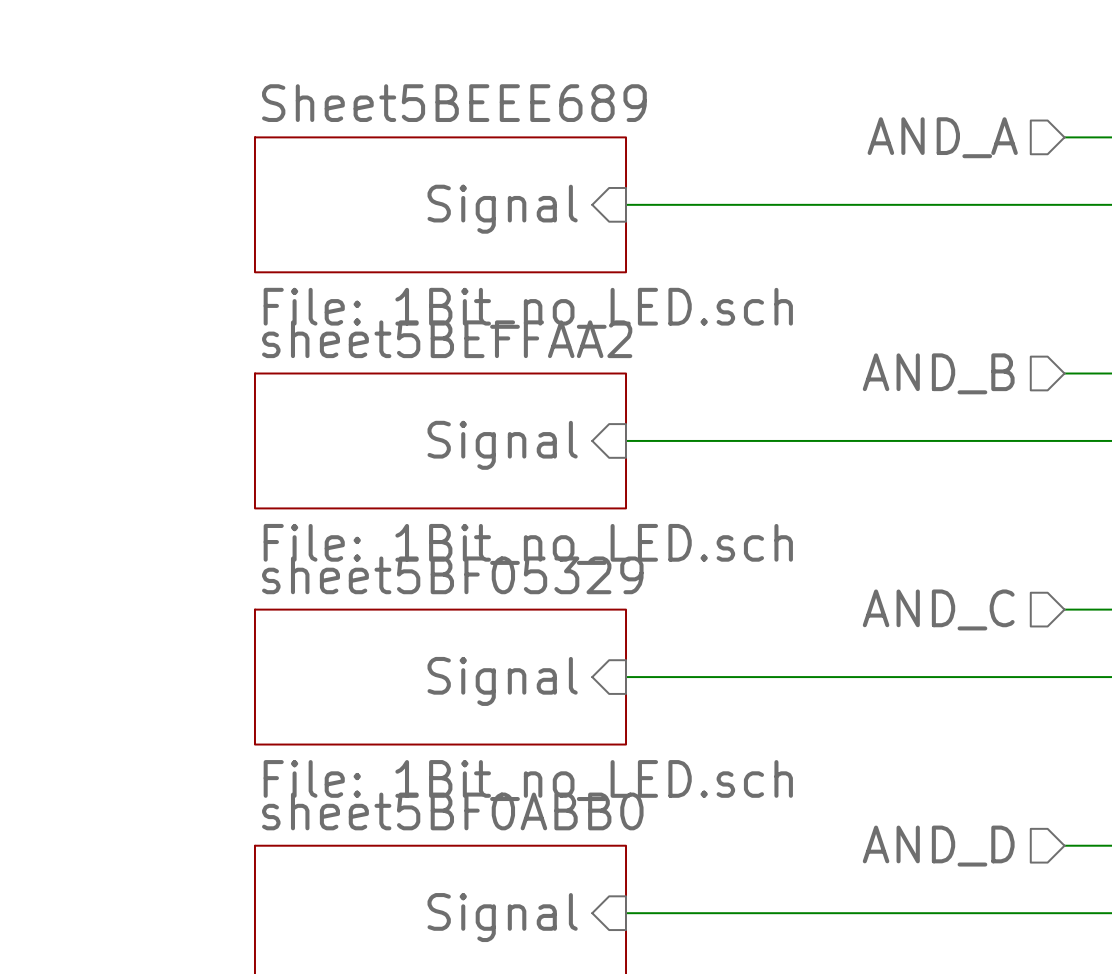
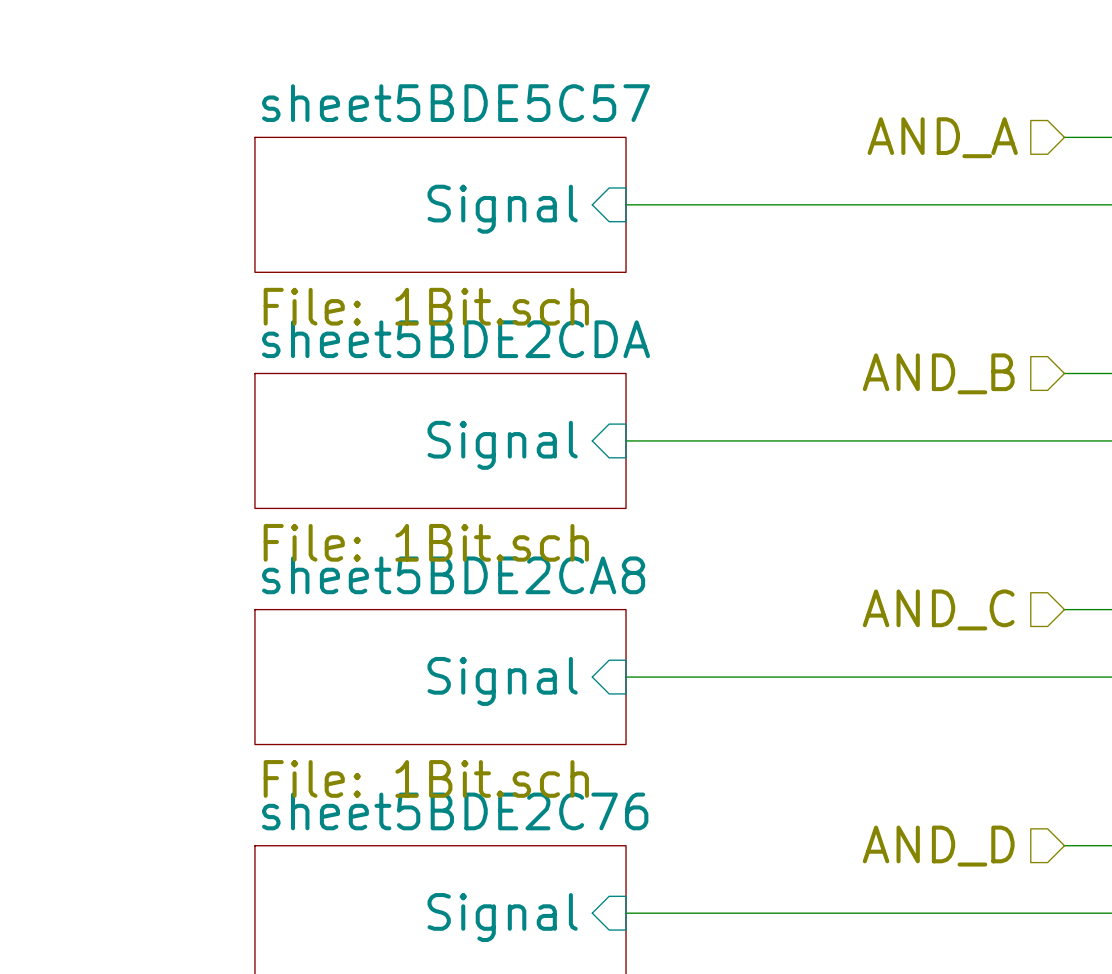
sheet Sheet5BEEE689 name: Sheet5BEEE689 (454, 103) -> sheet5BDE5C57 (456, 103)
sheet Sheet5BEEE689 value: File: 1Bit_no_LED.sch (528, 308) -> File: 1Bit.sch (426, 306)
sheet sheet5BEFFAA2 name: sheet5BEFFAA2 (447, 339) -> sheet5BDE2CDA (456, 339)
sheet sheet5BEFFAA2 value: File: 1Bit_no_LED.sch (528, 544) -> File: 1Bit.sch (426, 542)
sheet sheet5BF05329 name: sheet5BF05329 (452, 575) -> sheet5BDE2CA8 (453, 575)
sheet sheet5BF05329 value: File: 1Bit_no_LED.sch (528, 780) -> File: 1Bit.sch (426, 778)
sheet sheet5BF0ABB0 name: sheet5BF0ABB0 (452, 811) -> sheet5BDE2C76 (455, 811)

